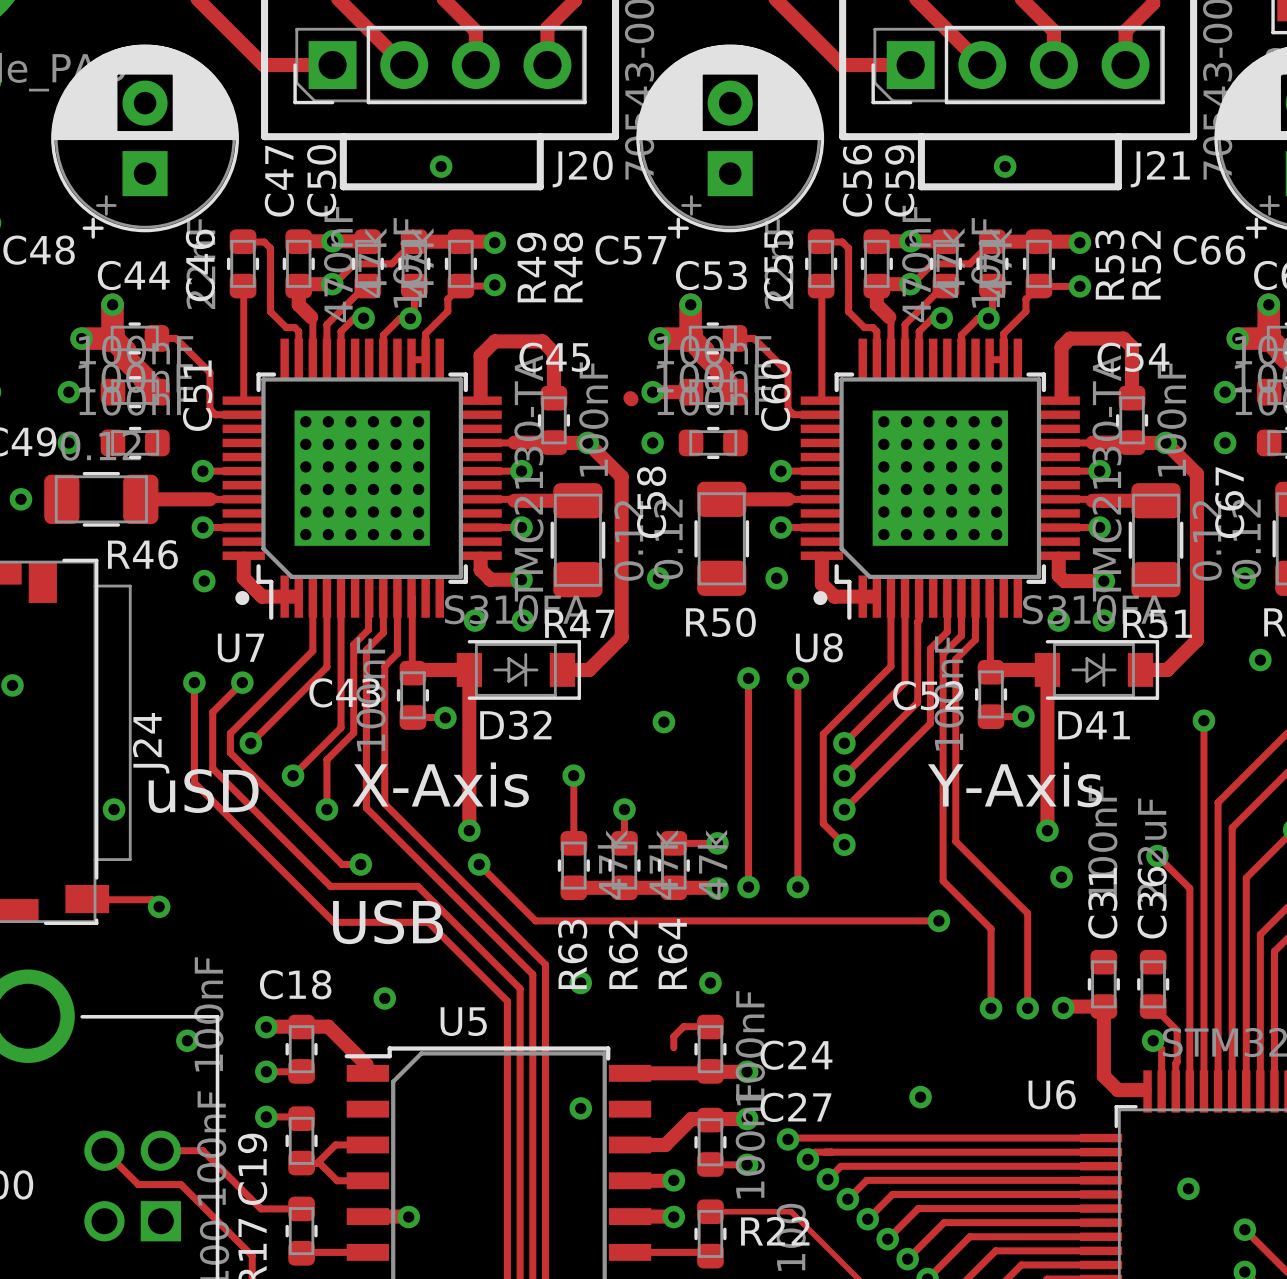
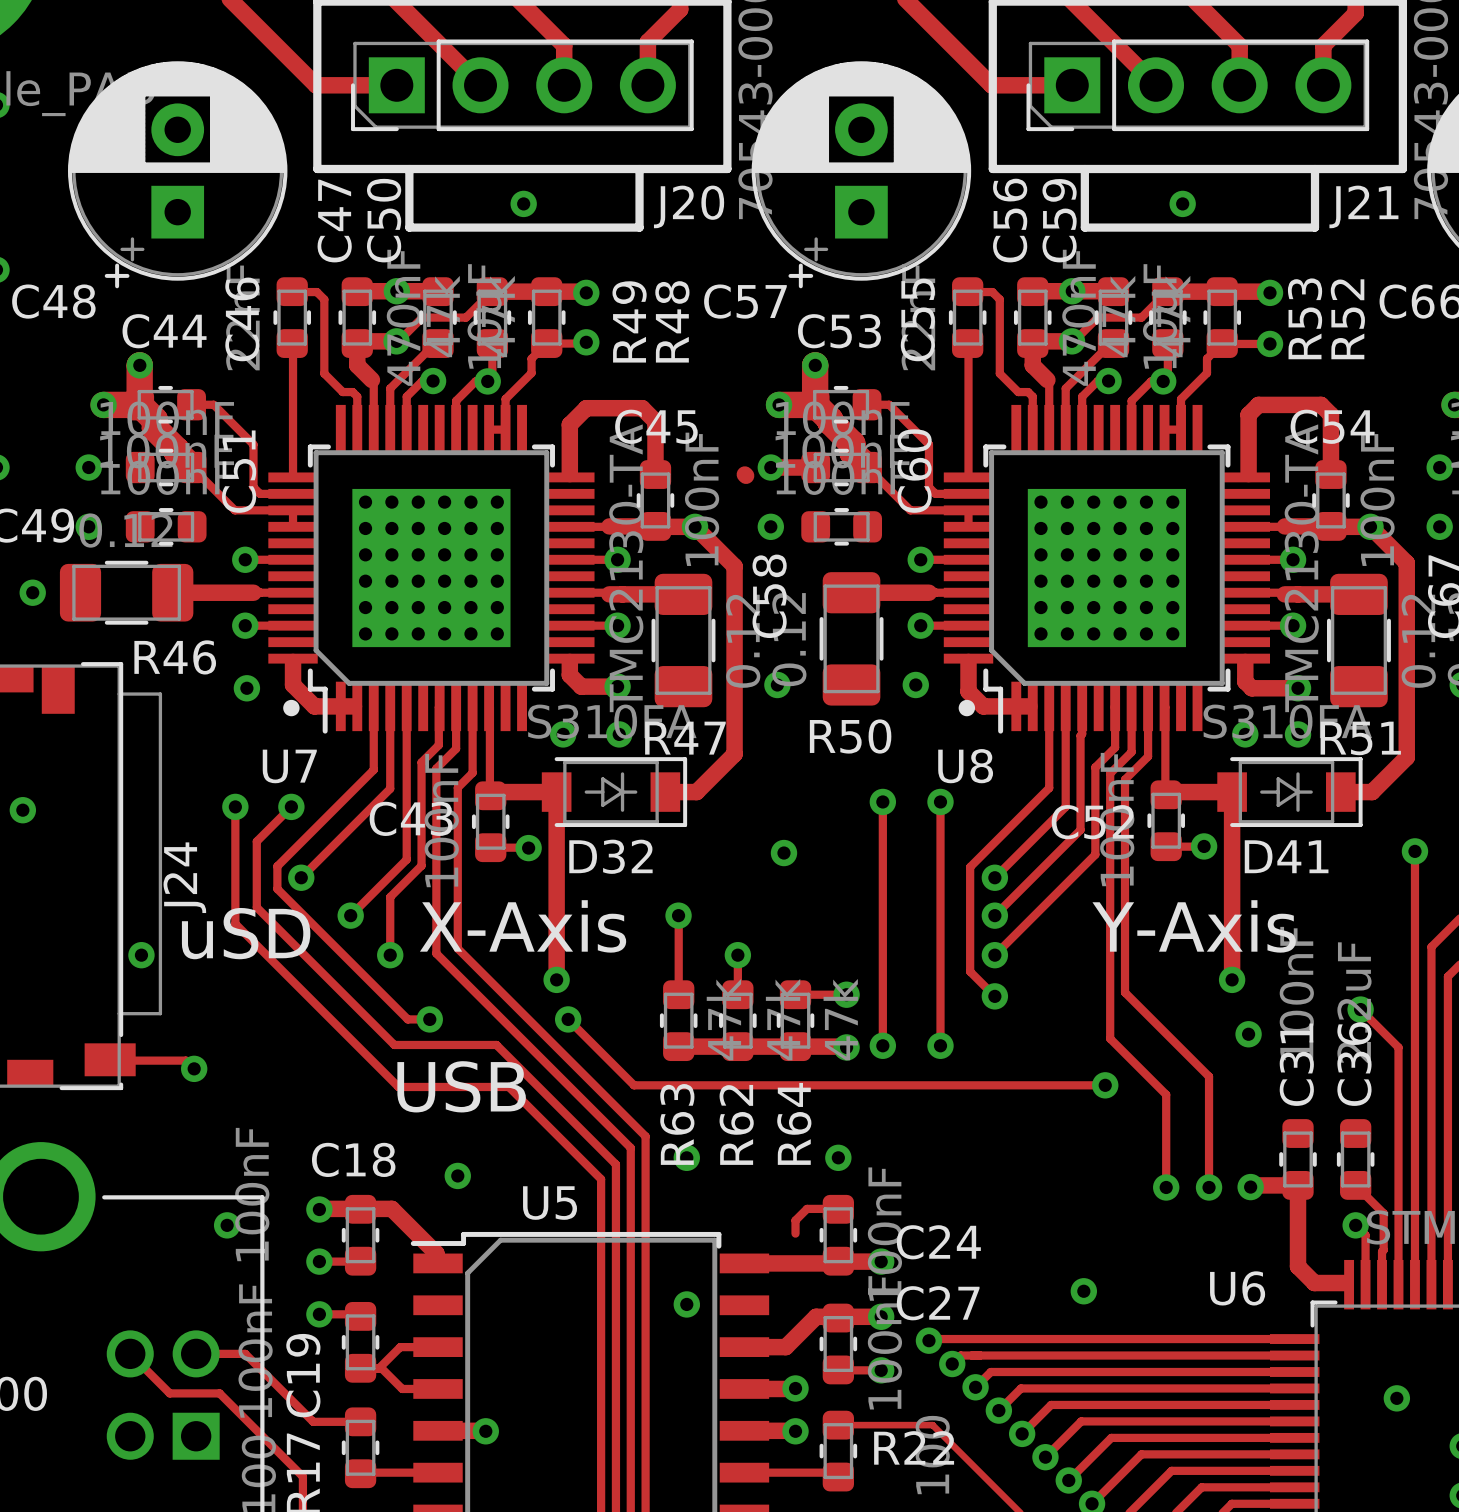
track: none -> (192, 467) (234, 510) (293, 510) (293, 526)
track: none -> (867, 467) (910, 510) (968, 510) (968, 526)

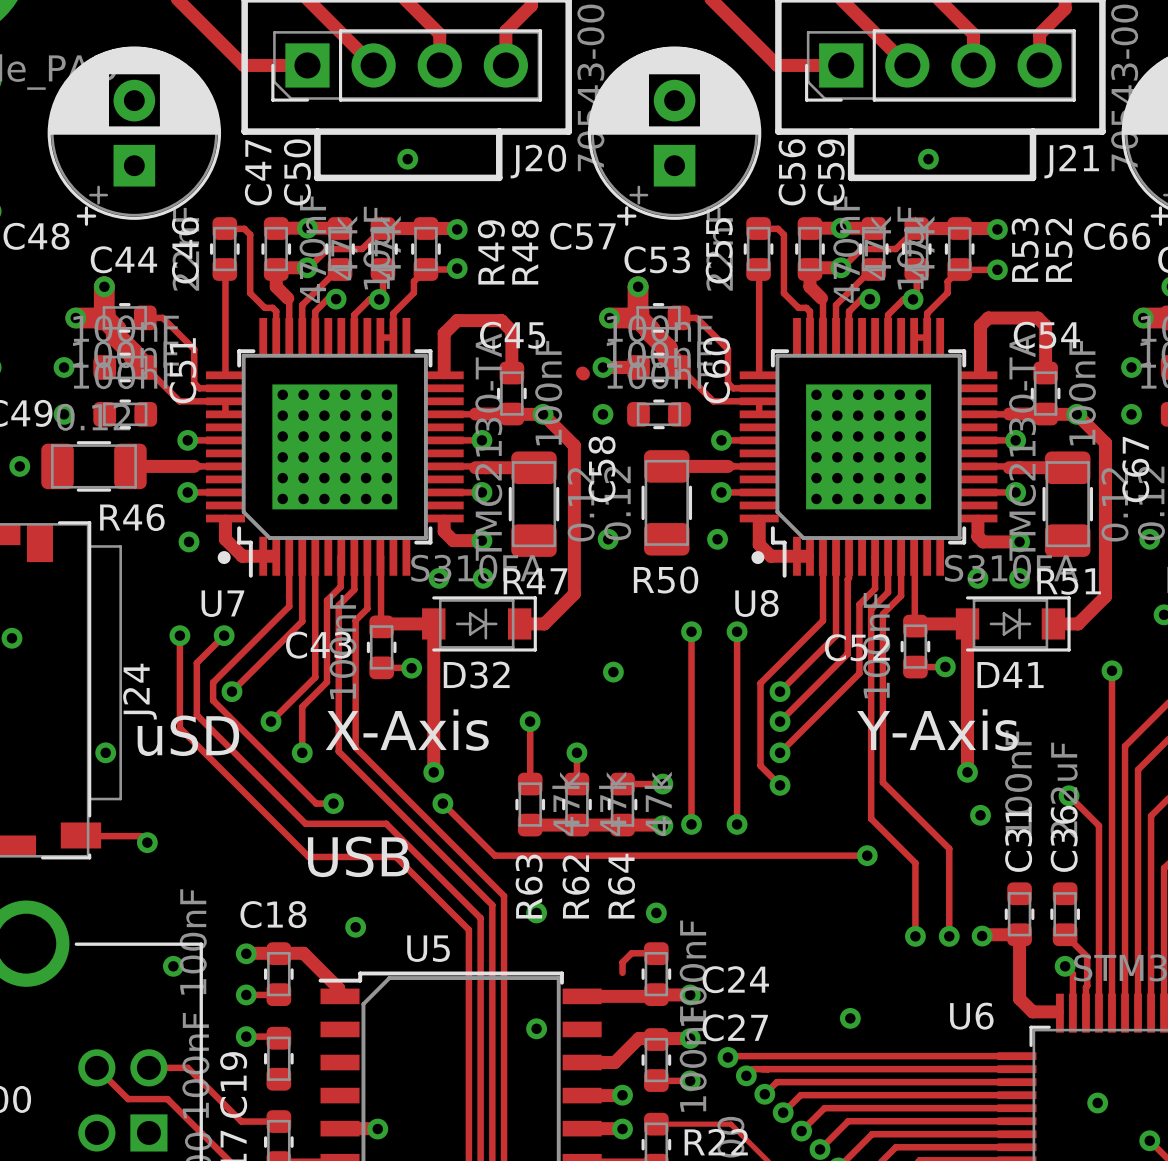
track: (438, 1347) (400, 1347) (378, 1368) -> none
track: (360, 1368) (382, 1368) (402, 1388) (438, 1388) -> none

